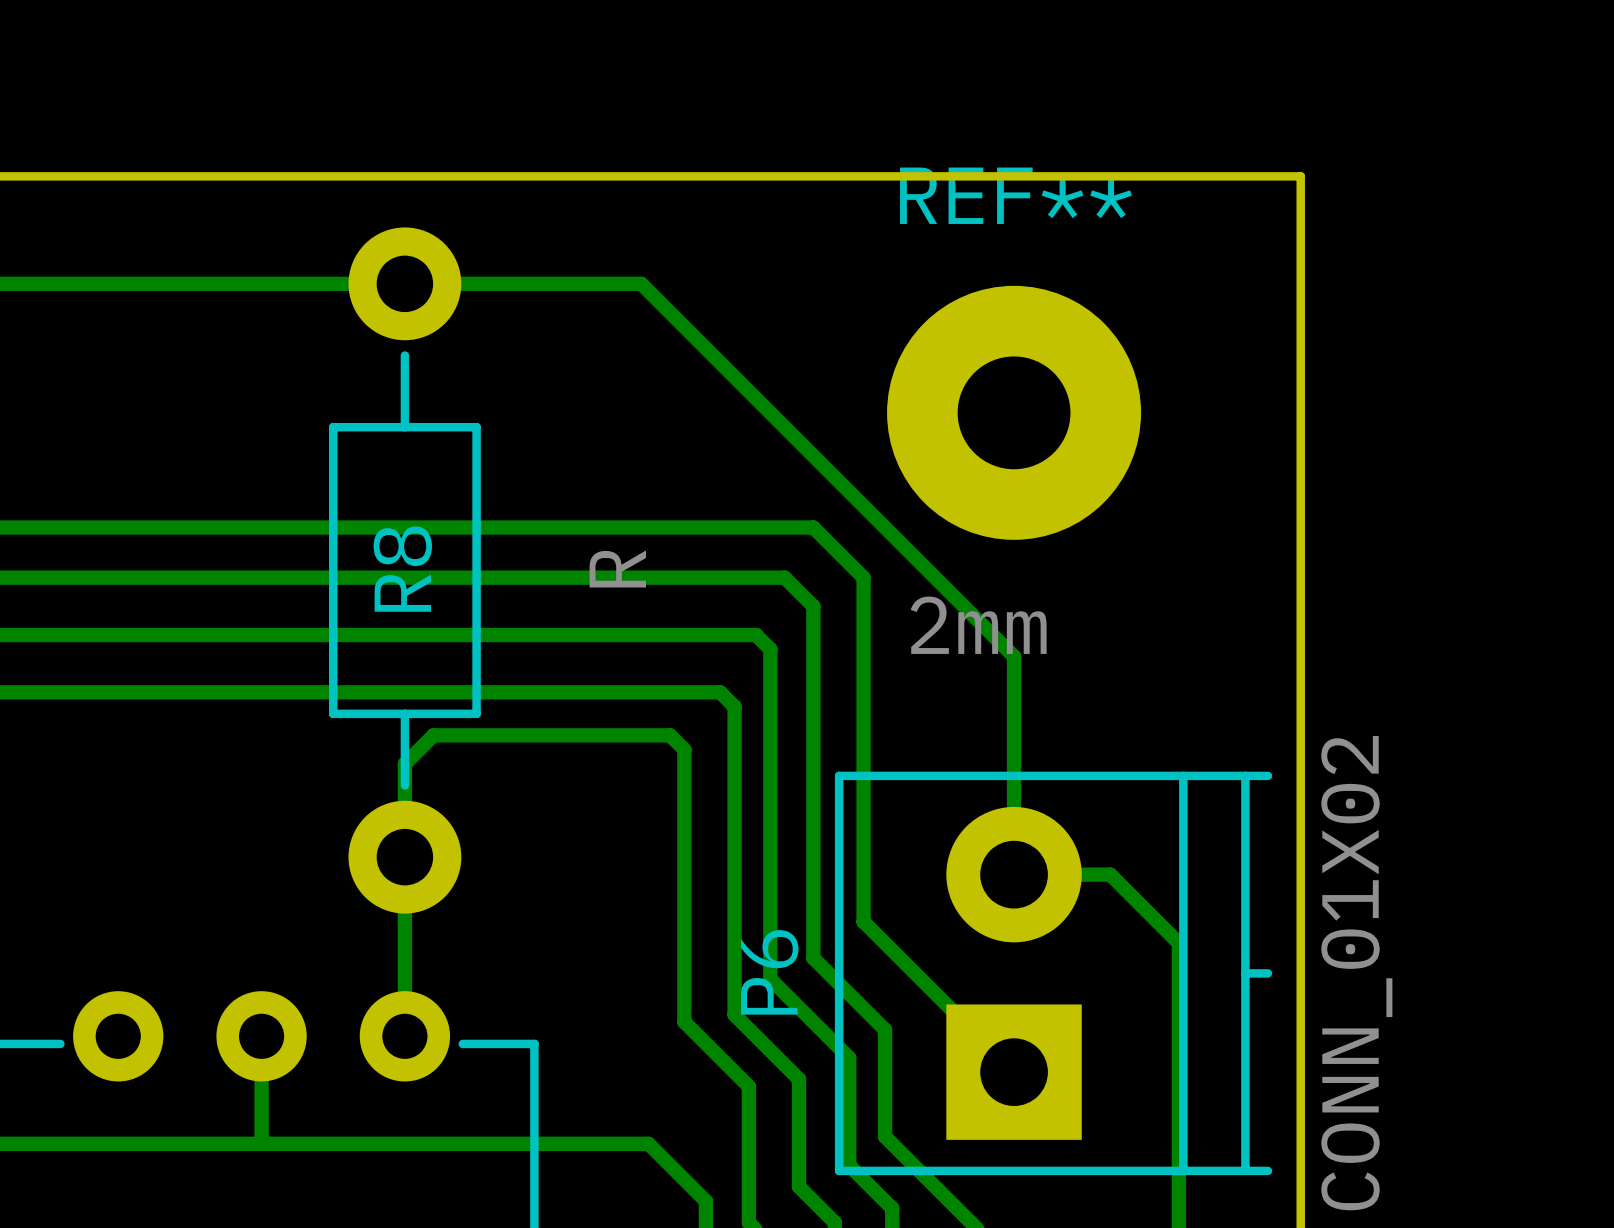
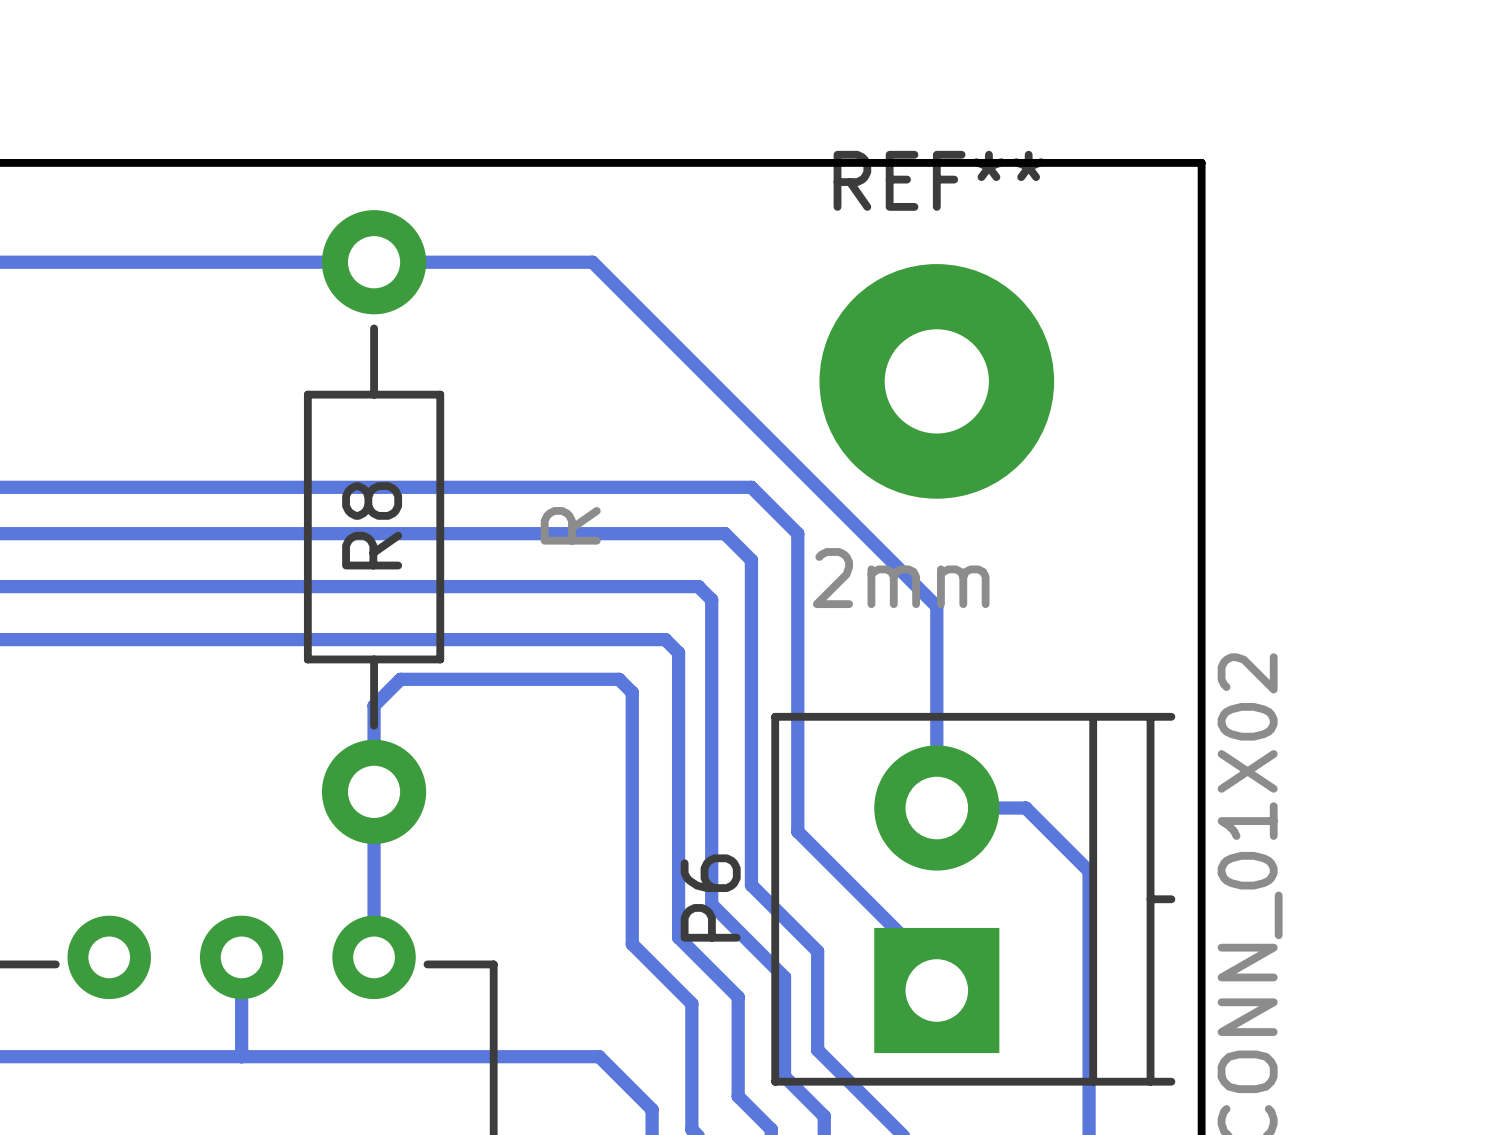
bottom track: (863, 900) (863, 921) (1014, 1072) -> (797, 831) (936, 970) (936, 990)

